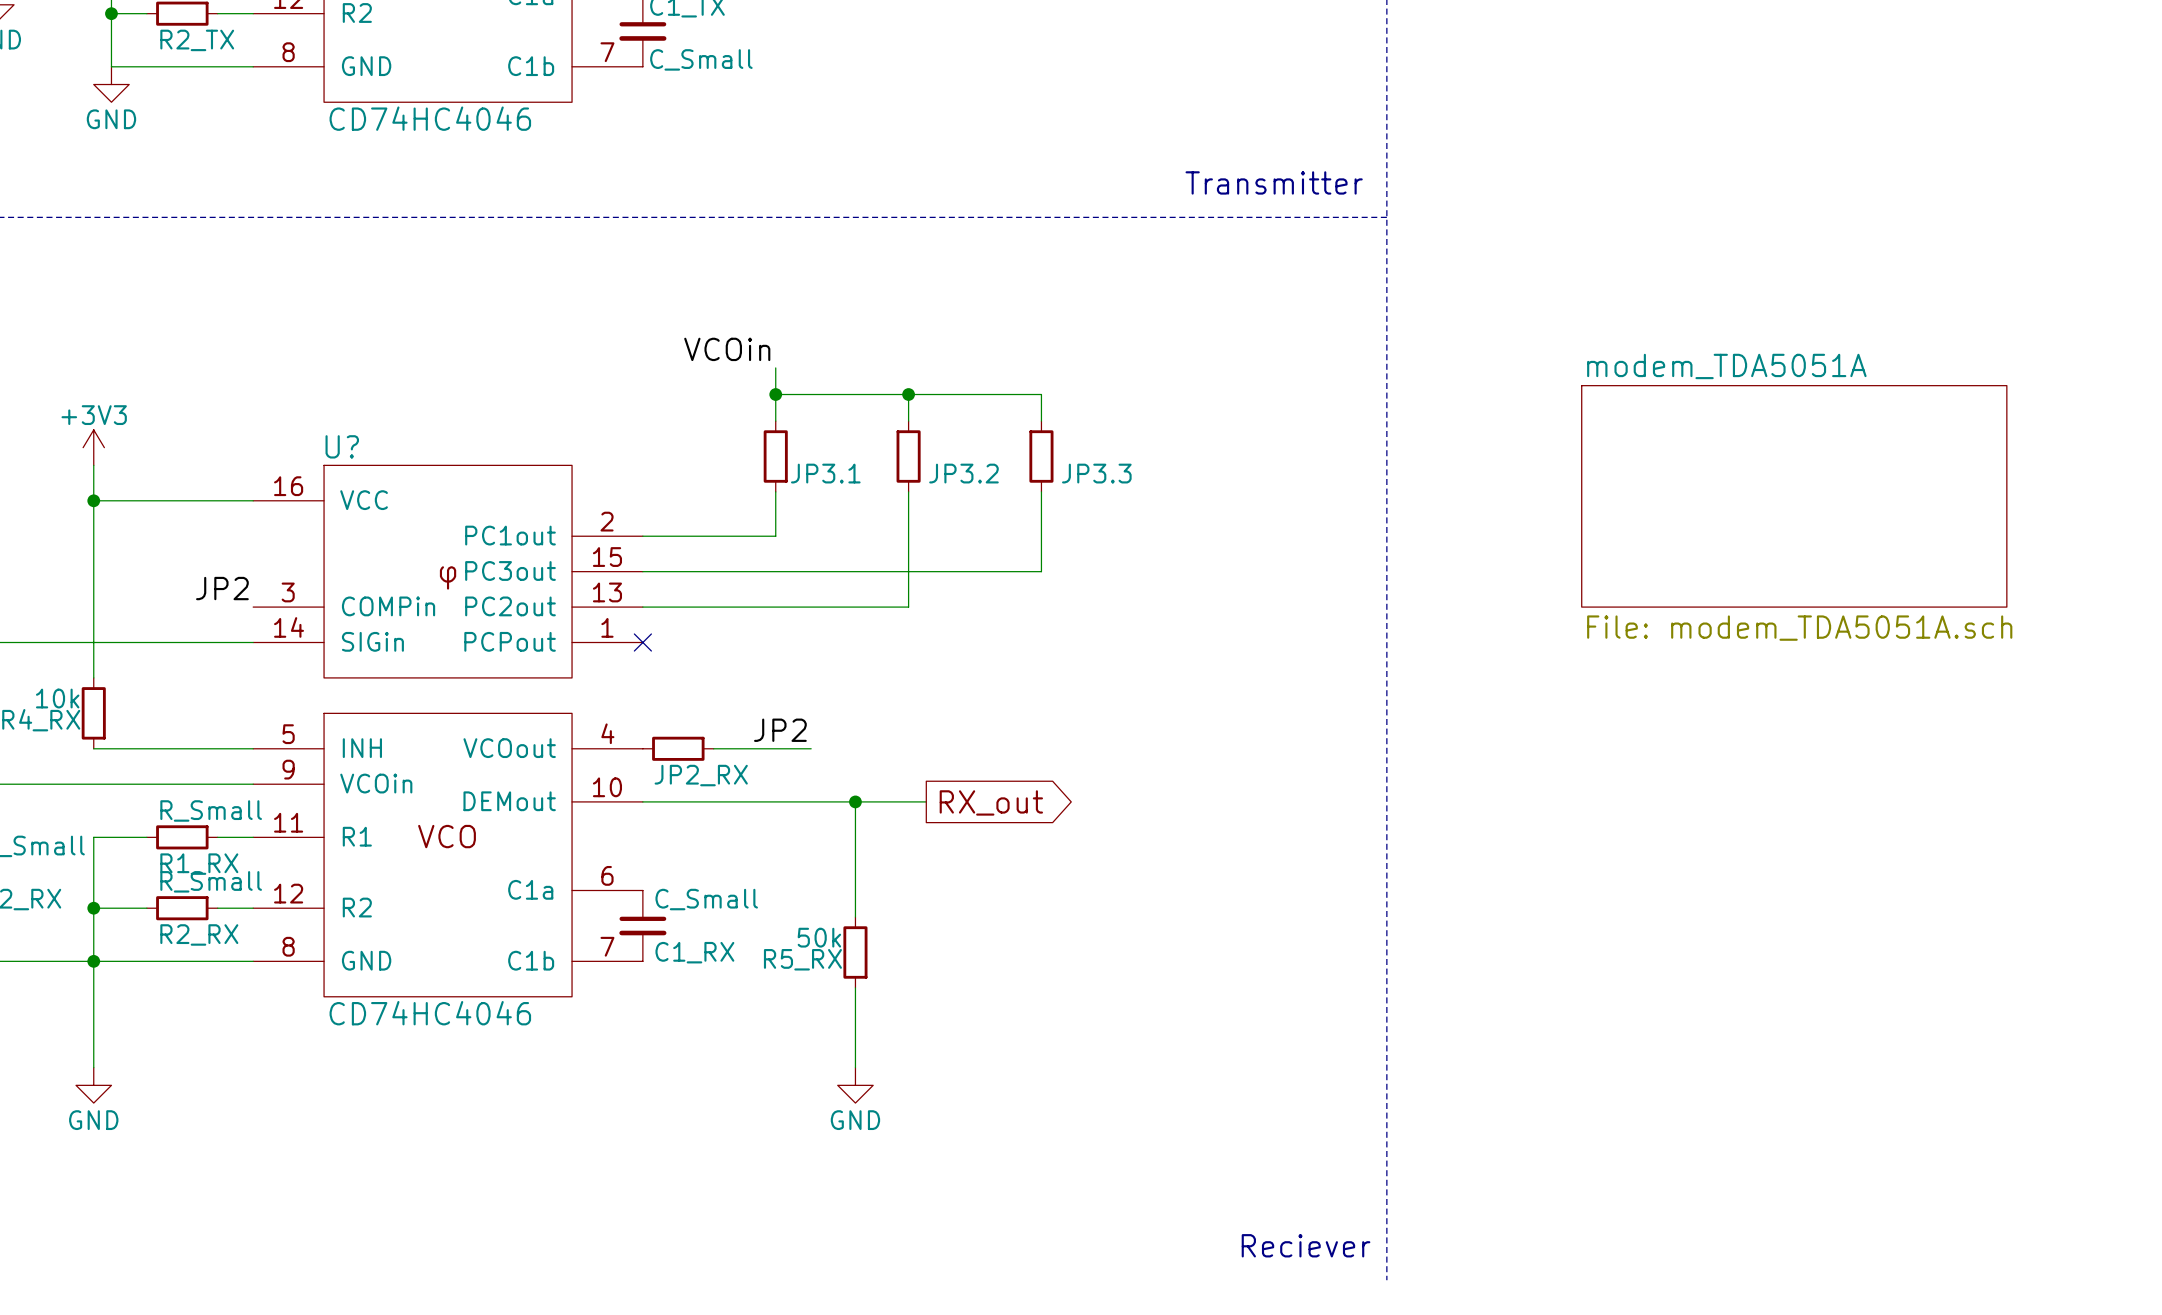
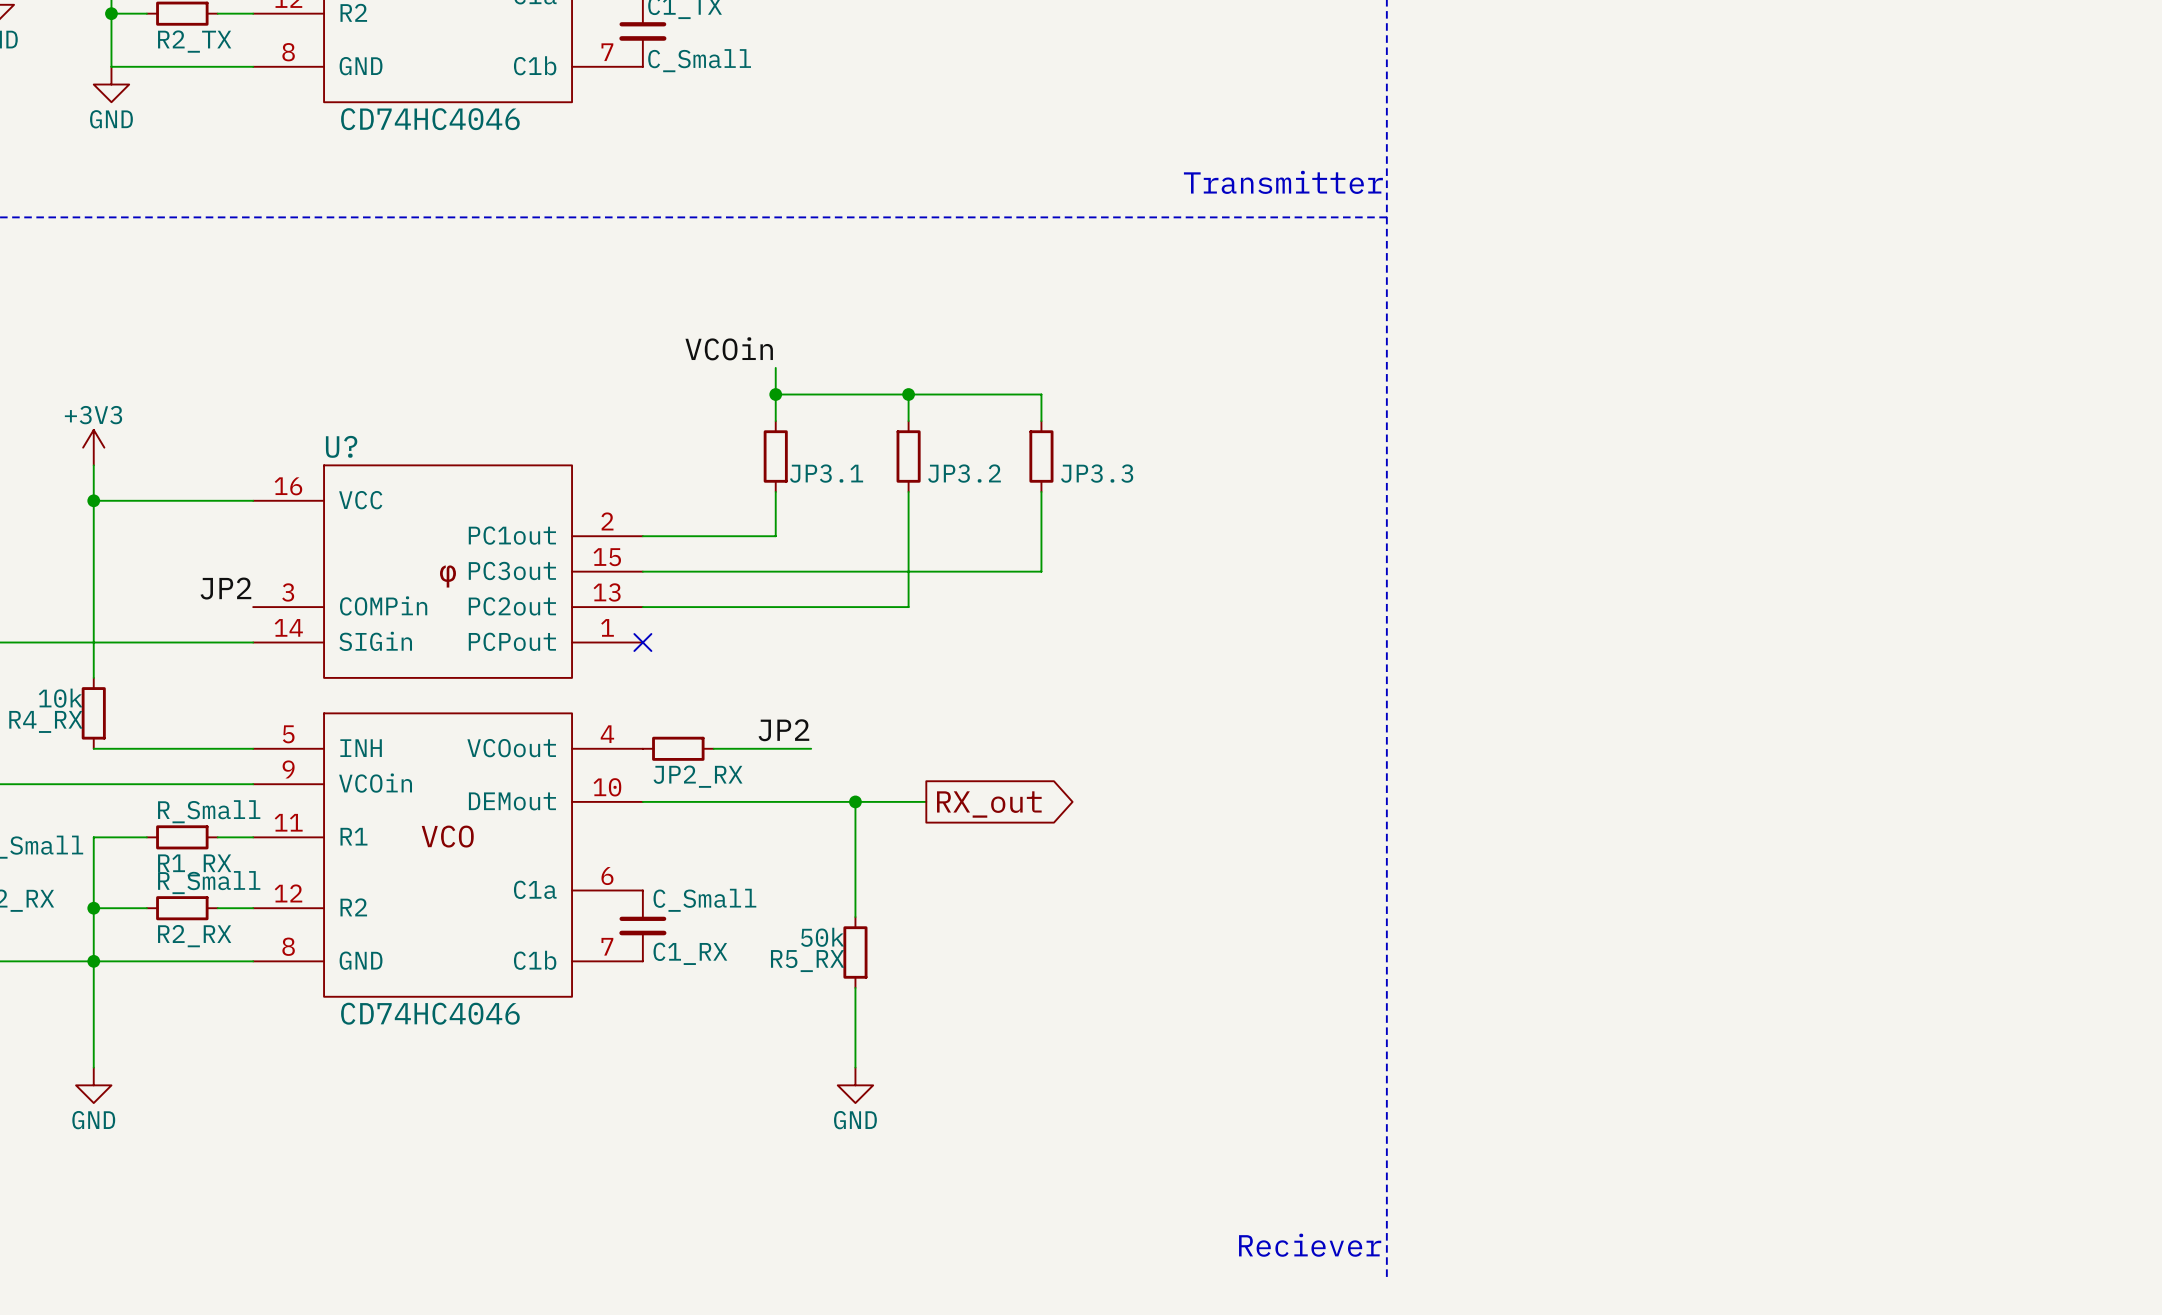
sheet modem_TDA5051A: File: modem_TDA5051A.sch (1794, 496) -> none

